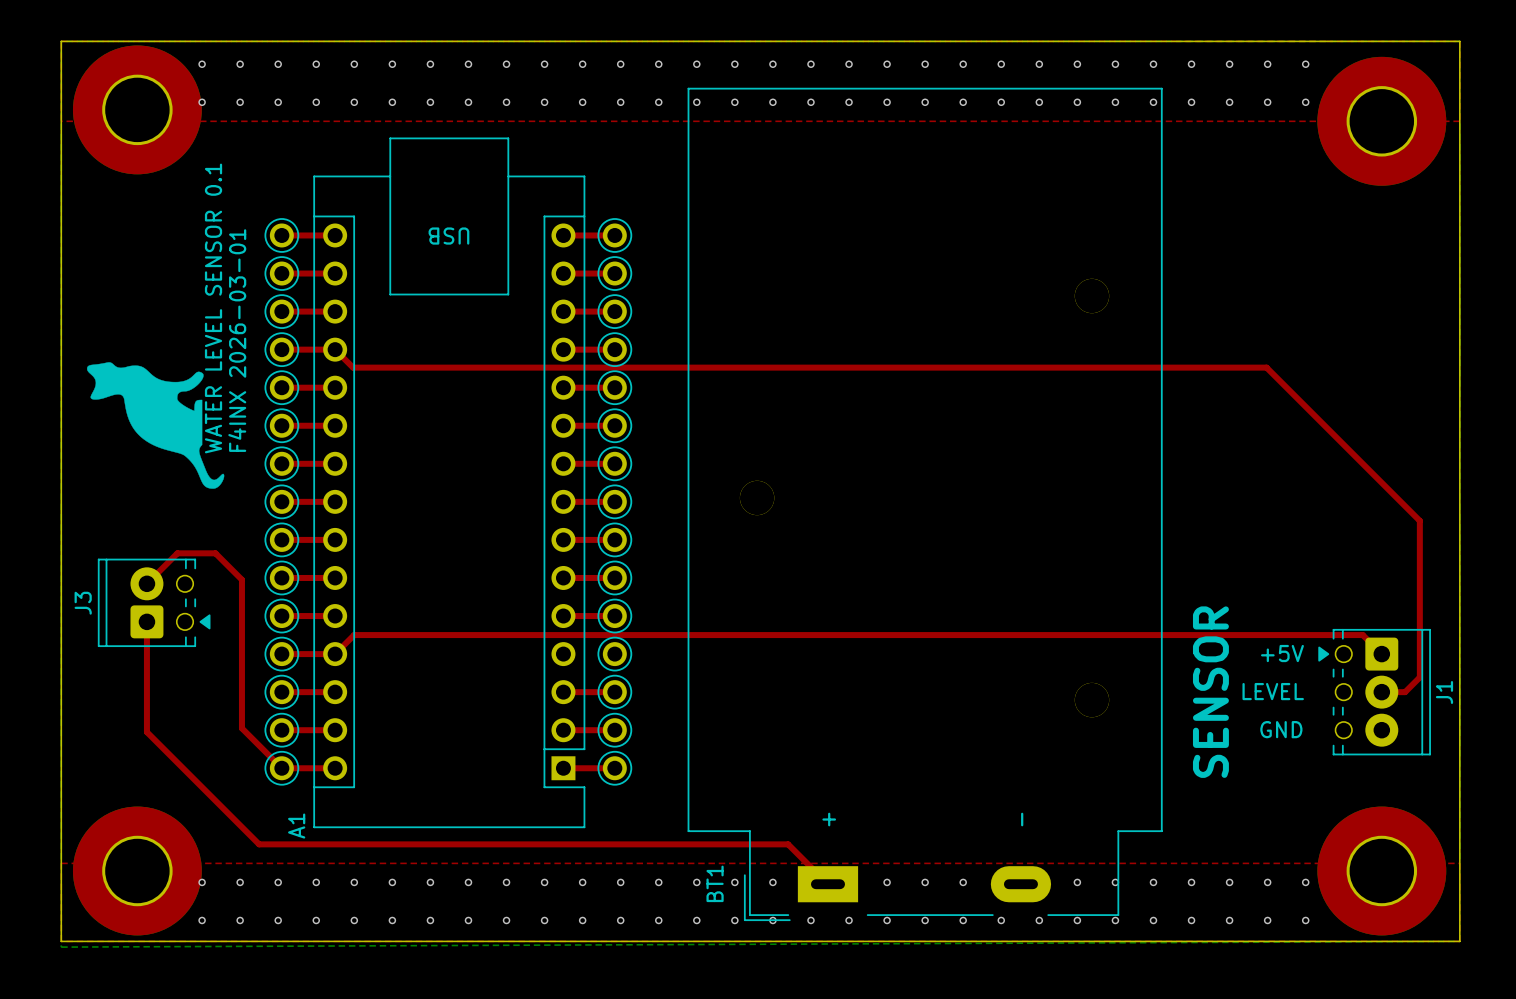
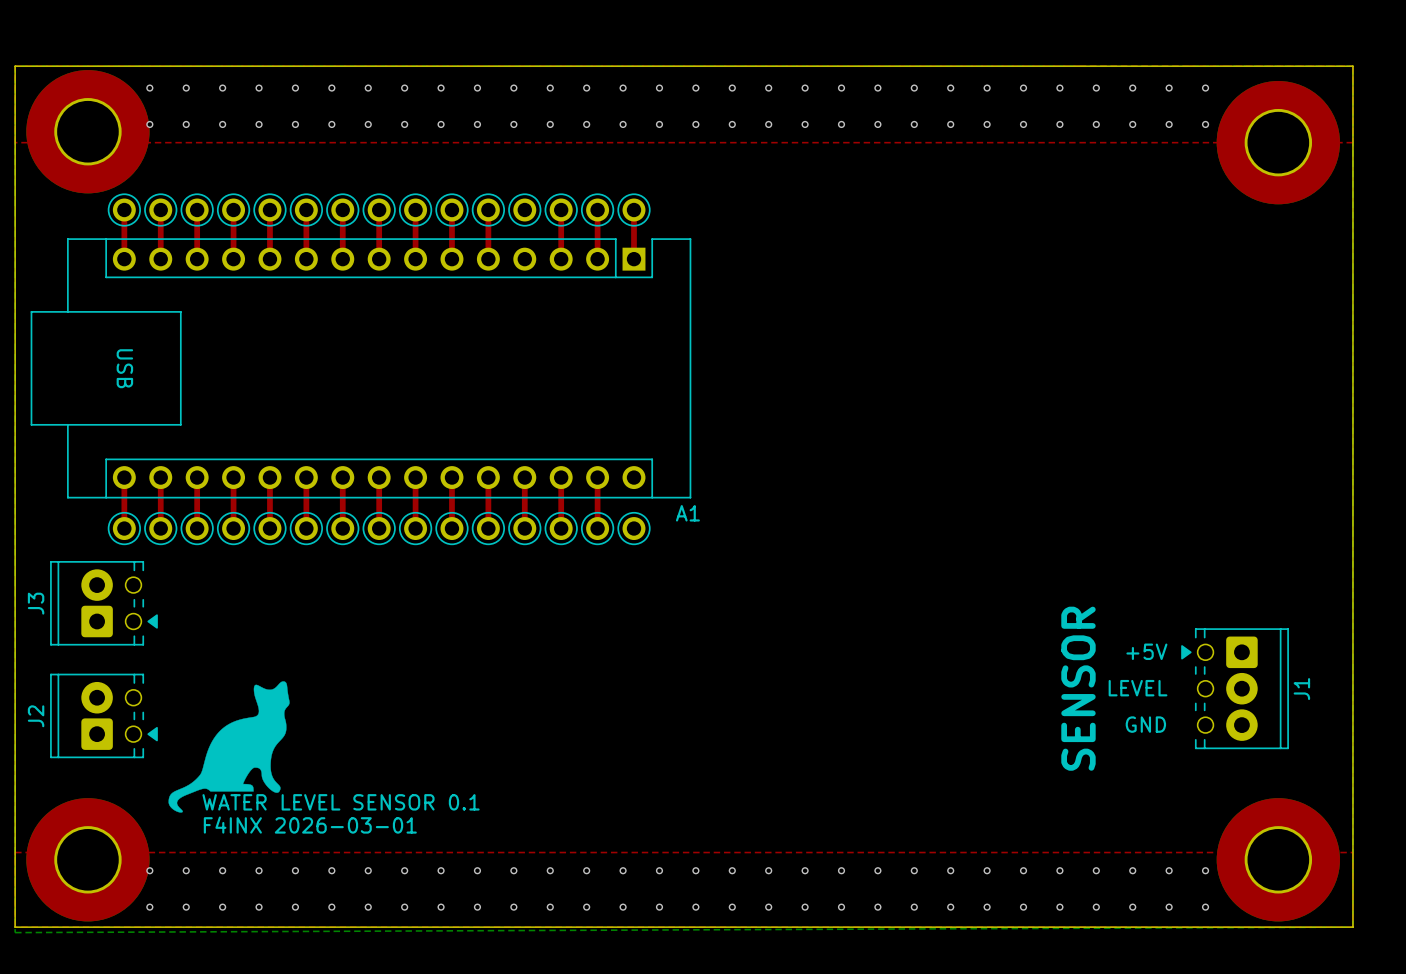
top track: none -> (124, 210) (124, 259)
part: none -> (124, 210)
top track: none -> (160, 210) (160, 259)
part: none -> (160, 210)
top track: none -> (197, 210) (197, 259)
part: none -> (197, 210)
top track: none -> (233, 210) (233, 259)
part: none -> (233, 210)
top track: none -> (269, 210) (269, 259)
part: none -> (269, 210)
top track: none -> (306, 210) (306, 259)
part: none -> (306, 210)
top track: none -> (342, 210) (342, 259)
part: none -> (342, 210)
top track: none -> (379, 210) (379, 259)
part: none -> (379, 210)
top track: none -> (415, 210) (415, 259)
part: none -> (415, 210)
top track: none -> (451, 210) (451, 259)
part: none -> (451, 210)
top track: none -> (488, 210) (488, 259)
part: none -> (488, 210)
part: none -> (524, 210)
top track: none -> (561, 210) (561, 259)
part: none -> (561, 210)
top track: none -> (597, 210) (597, 259)
part: none -> (597, 210)
top track: none -> (634, 210) (634, 259)
part: none -> (634, 210)
top track: (281, 235) (335, 235) -> none
part: (281, 235) -> none
top track: (563, 235) (614, 235) -> none
part: (614, 235) -> none
top track: (281, 273) (335, 273) -> none
part: (281, 273) -> none
top track: (563, 273) (614, 273) -> none
part: (614, 273) -> none
text rotation: 0° (213, 308) -> 90° clockwise (341, 802)
text position: WATER LEVEL SENSOR 0.1 (213, 308) -> WATER LEVEL SENSOR 0.1 (341, 802)
top track: (281, 311) (335, 311) -> none
part: (281, 311) -> none
top track: (563, 311) (614, 311) -> none
part: (614, 311) -> none
text: F4INX 2026-03-01 (237, 340) -> none
top track: (281, 349) (335, 349) (353, 367) (1266, 367) (1419, 520) (1419, 677) (1405, 692) (1381, 692) -> none
part: (281, 349) -> none
top track: (563, 349) (614, 349) -> none
part: (614, 349) -> none
drawing: [86, 362, 225, 489] -> none
top track: (281, 387) (335, 387) -> none
part: (281, 387) -> none
top track: (563, 387) (614, 387) -> none
part: (614, 387) -> none
top track: (281, 425) (335, 425) -> none
part: (281, 425) -> none
top track: (563, 425) (614, 425) -> none
part: (614, 425) -> none
top track: (281, 463) (335, 463) -> none
part: (281, 463) -> none
top track: (563, 463) (614, 463) -> none
part: (614, 463) -> none
top track: none -> (124, 477) (124, 528)
top track: none -> (160, 477) (160, 528)
top track: none -> (197, 477) (197, 528)
top track: none -> (233, 477) (233, 528)
top track: none -> (269, 477) (269, 528)
top track: none -> (306, 477) (306, 528)
top track: none -> (342, 477) (342, 528)
top track: none -> (379, 477) (379, 528)
top track: none -> (415, 477) (415, 528)
top track: none -> (451, 477) (451, 528)
top track: none -> (488, 477) (488, 528)
top track: none -> (524, 477) (524, 528)
top track: none -> (561, 477) (561, 528)
top track: none -> (597, 477) (597, 528)
A1 rotation: 0° (449, 482) -> 90° counterclockwise (360, 368)
top track: (281, 501) (335, 501) -> none
part: (281, 501) -> none
top track: (563, 501) (614, 501) -> none
part: (614, 501) -> none
BT1: (925, 504) -> none
part: none -> (124, 528)
part: none -> (160, 528)
part: none -> (197, 528)
part: none -> (233, 528)
part: none -> (269, 528)
part: none -> (306, 528)
part: none -> (342, 528)
part: none -> (379, 528)
part: none -> (415, 528)
part: none -> (451, 528)
part: none -> (488, 528)
part: none -> (524, 528)
part: none -> (561, 528)
part: none -> (597, 528)
part: none -> (634, 528)
top track: (281, 539) (335, 539) -> none
part: (281, 539) -> none
top track: (563, 539) (614, 539) -> none
part: (614, 539) -> none
top track: (281, 577) (335, 577) -> none
part: (281, 577) -> none
top track: (563, 577) (614, 577) -> none
part: (614, 577) -> none
top track: (146, 583) (177, 553) (215, 553) (241, 579) (241, 728) (281, 768) (335, 768) -> none
top track: (281, 616) (335, 616) -> none
part: (281, 616) -> none
top track: (563, 616) (614, 616) -> none
part: (614, 616) -> none
top track: (146, 621) (146, 732) (259, 844) (788, 844) (827, 884) -> none
text position: +5V (1282, 653) -> +5V (1146, 651)
top track: (281, 654) (335, 654) (354, 635) (1362, 635) (1381, 654) -> none
part: (281, 654) -> none
part: (614, 654) -> none
drawing: none -> [168, 681, 290, 813]
text position: LEVEL (1273, 691) -> LEVEL (1138, 688)
top track: (281, 692) (335, 692) -> none
part: (281, 692) -> none
top track: (563, 692) (614, 692) -> none
part: (614, 692) -> none
text position: SENSOR (1210, 692) -> SENSOR (1078, 688)
J1 position: (1374, 692) -> (1235, 688)
J2: none -> (103, 715)
text position: GND (1281, 729) -> GND (1145, 724)
top track: (281, 730) (335, 730) -> none
part: (281, 730) -> none
top track: (563, 730) (614, 730) -> none
part: (614, 730) -> none
part: (281, 768) -> none
top track: (563, 768) (614, 768) -> none
part: (614, 768) -> none
text: none -> F4INX 2026-03-01 (310, 825)
via: none -> (732, 870)
via: none -> (768, 870)
via: none -> (914, 870)
via: none -> (950, 870)

